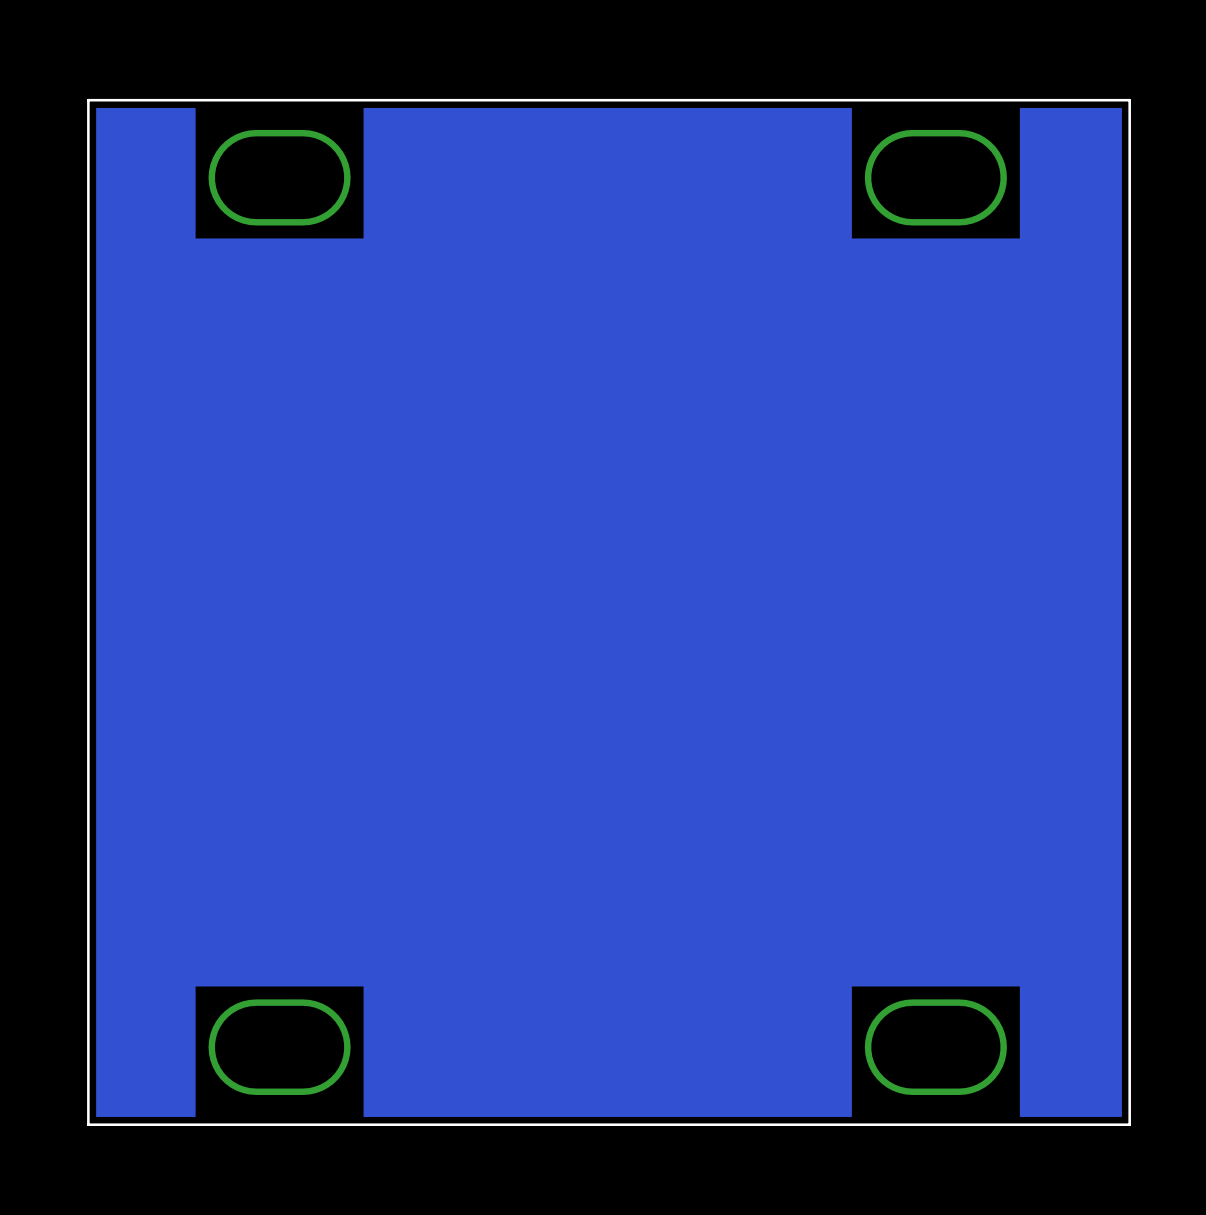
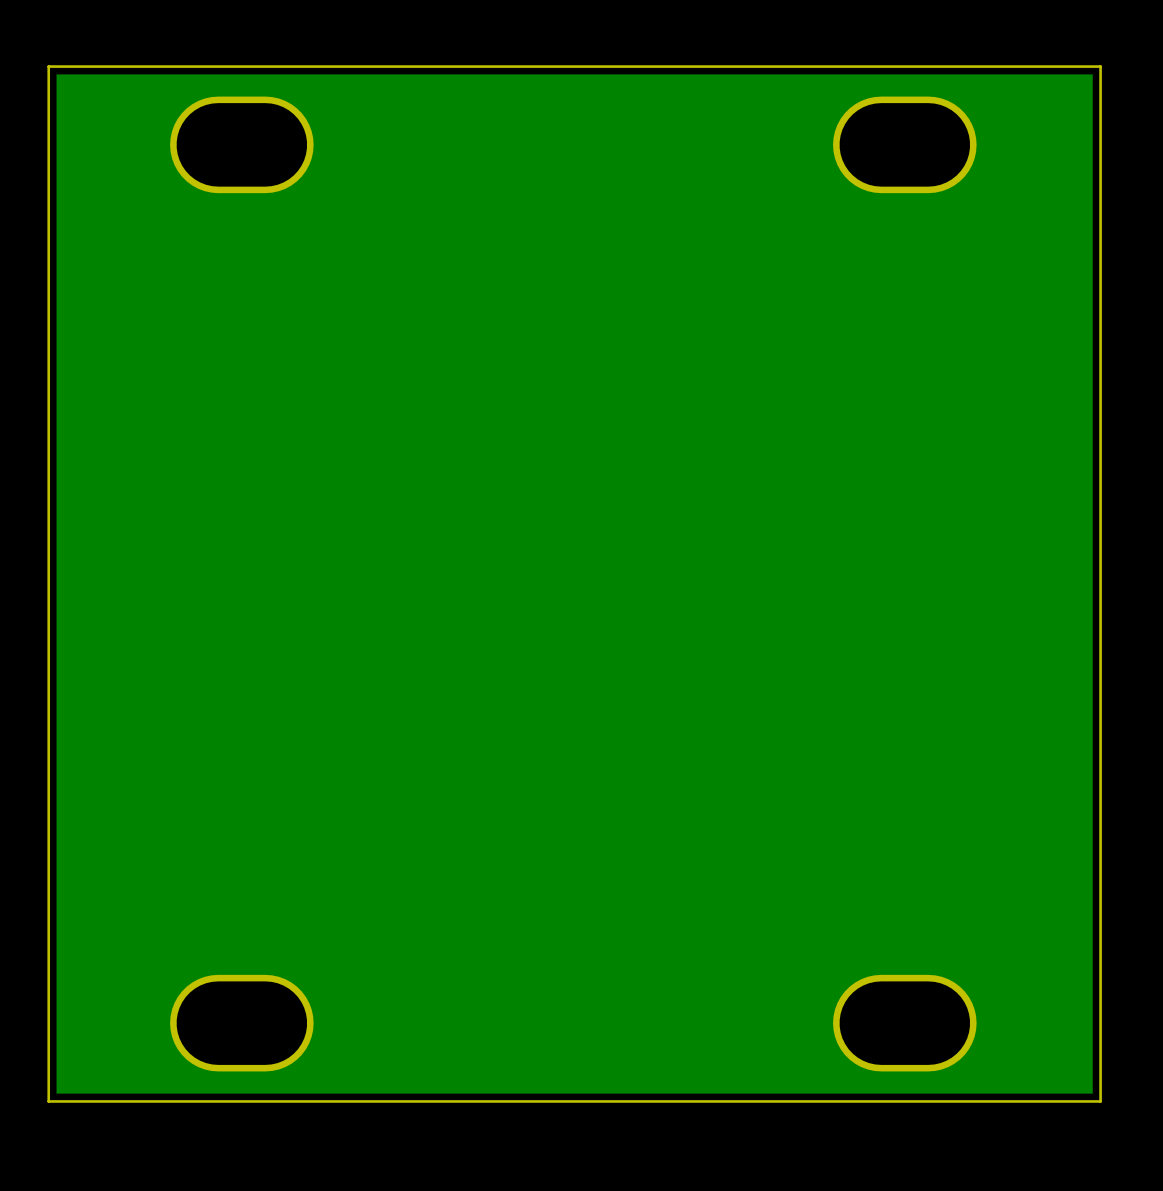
drawing: [96, 107, 196, 1117] -> none
drawing: [363, 107, 852, 239] -> none
drawing: [1019, 107, 1122, 1117] -> none
drawing shape: [195, 238, 1020, 987] -> [56, 74, 1093, 1094]
drawing: [363, 986, 852, 1117] -> none

